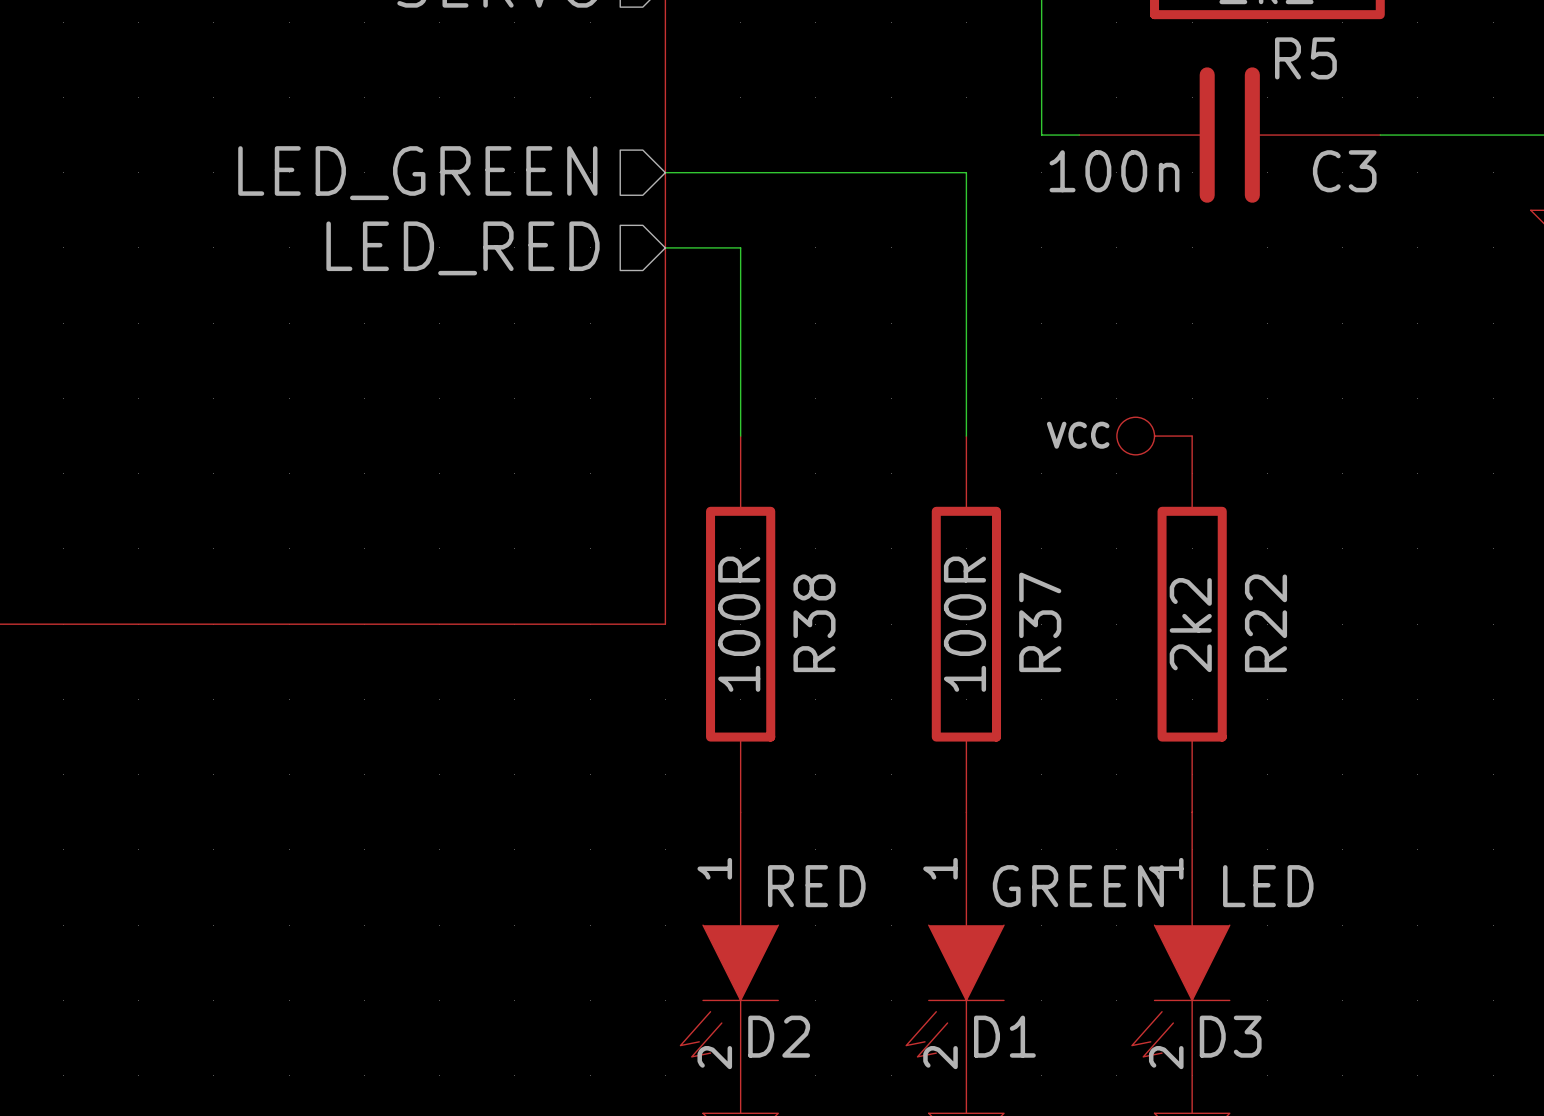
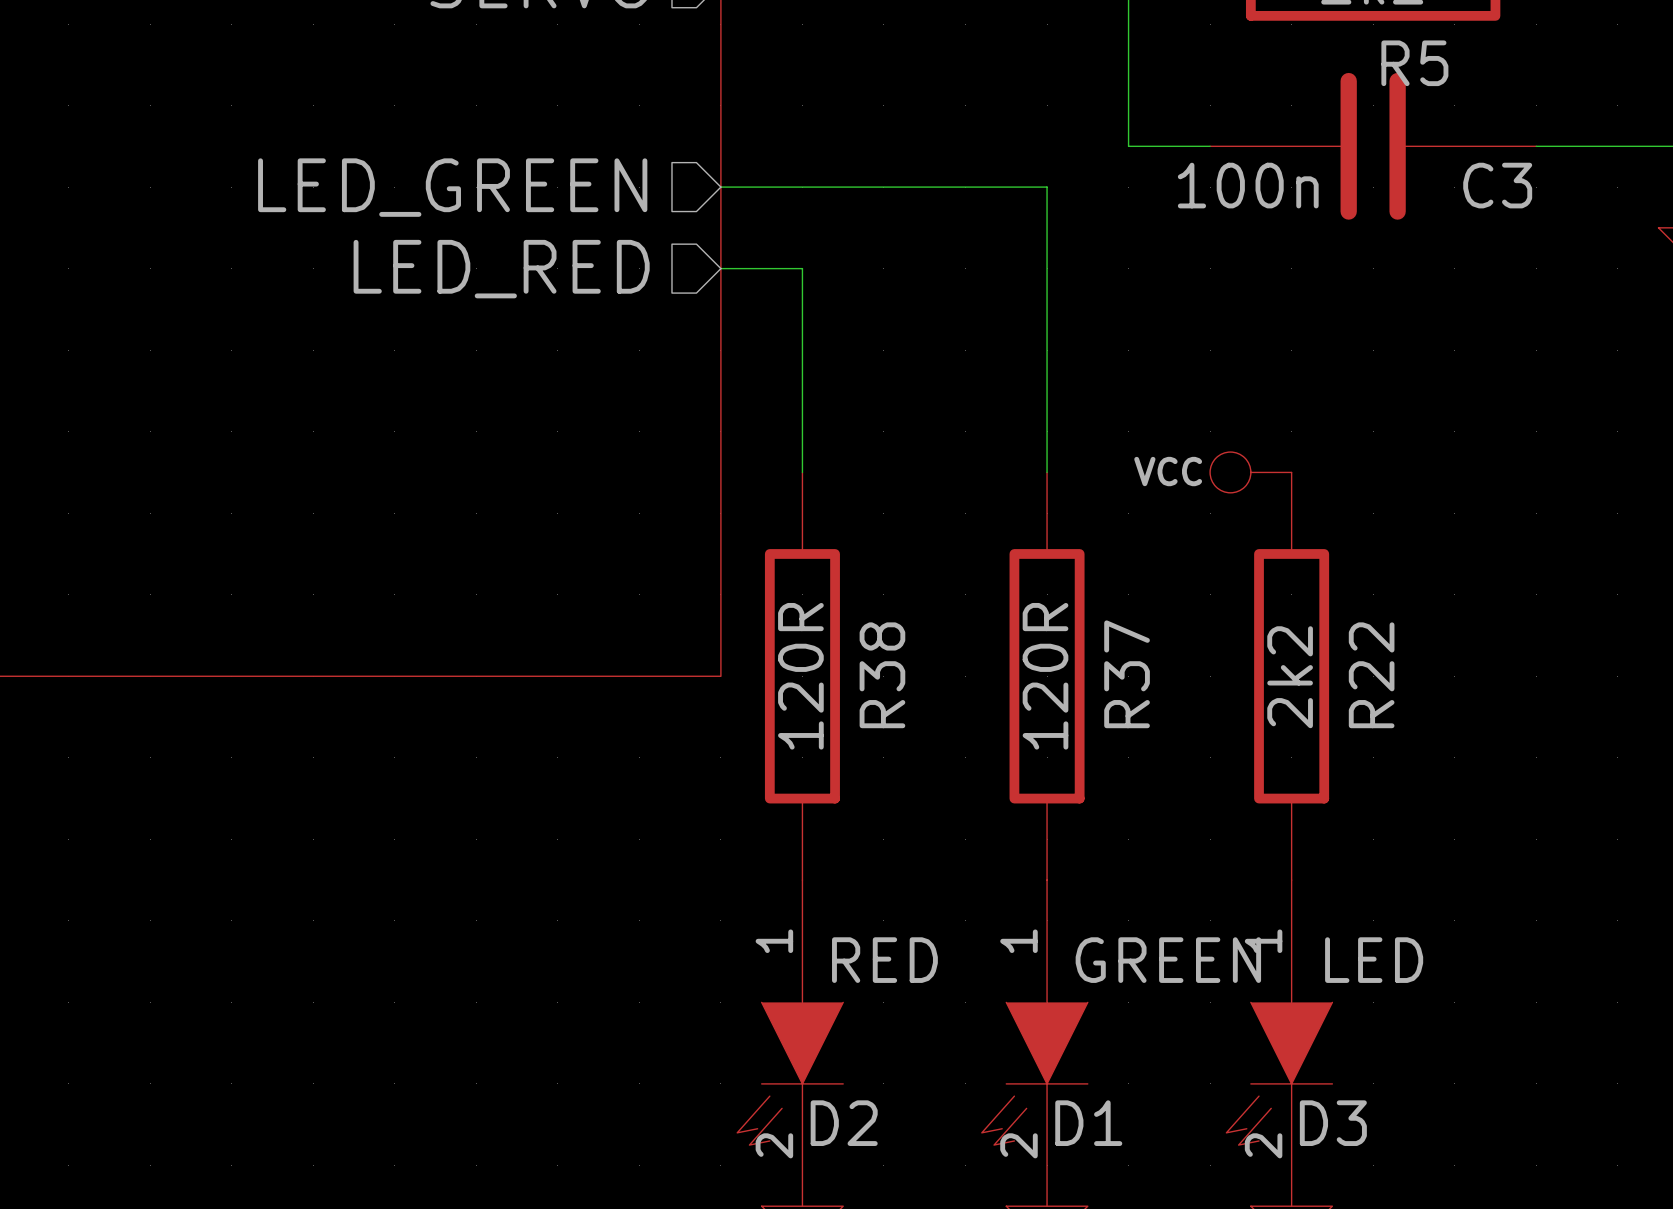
C3 position: (1229, 135) -> (1373, 146)
R38 value: 100R (739, 624) -> 120R (800, 676)
R37 value: 100R (964, 624) -> 120R (1045, 676)

